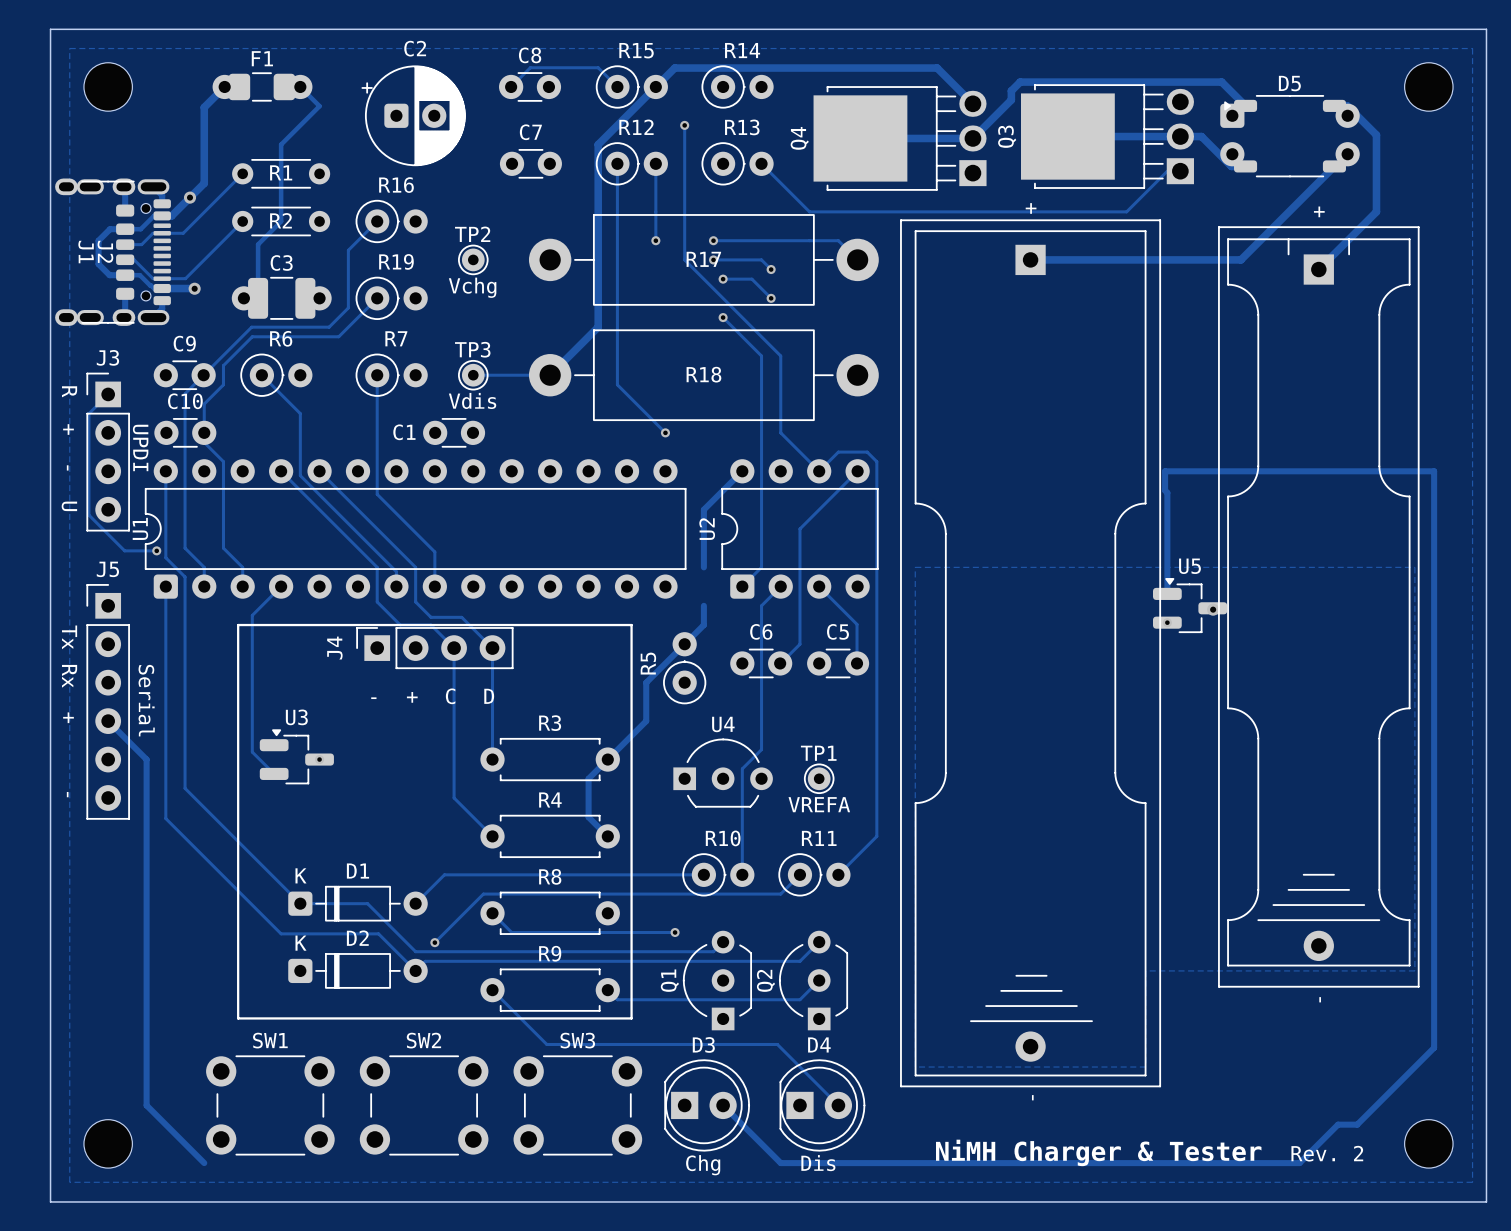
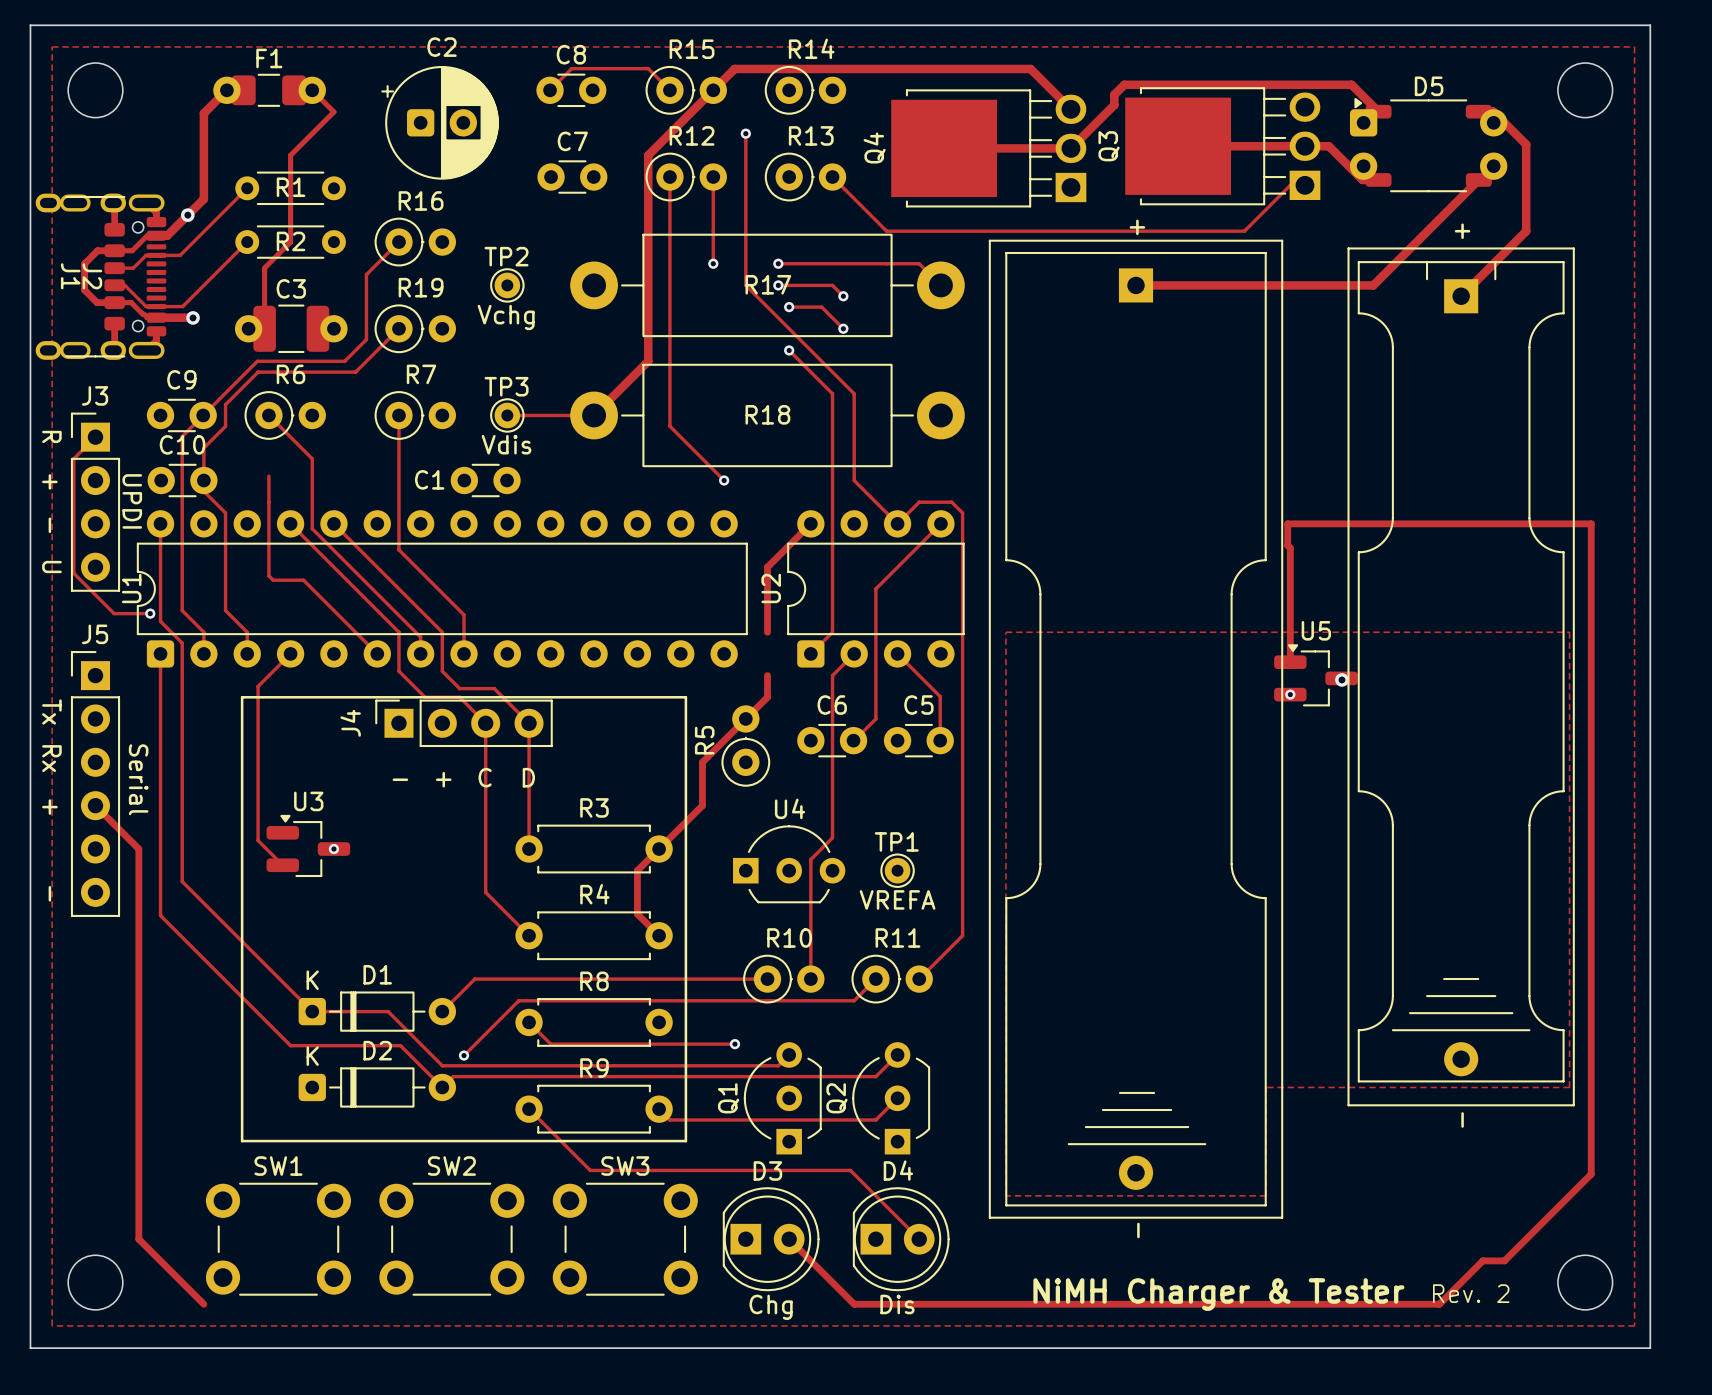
D5 footprint: [1224, 95, 1346, 178] -> [1354, 98, 1492, 193]
track: none -> (268, 476) (268, 575) (273, 580) (303, 580) (377, 653)

